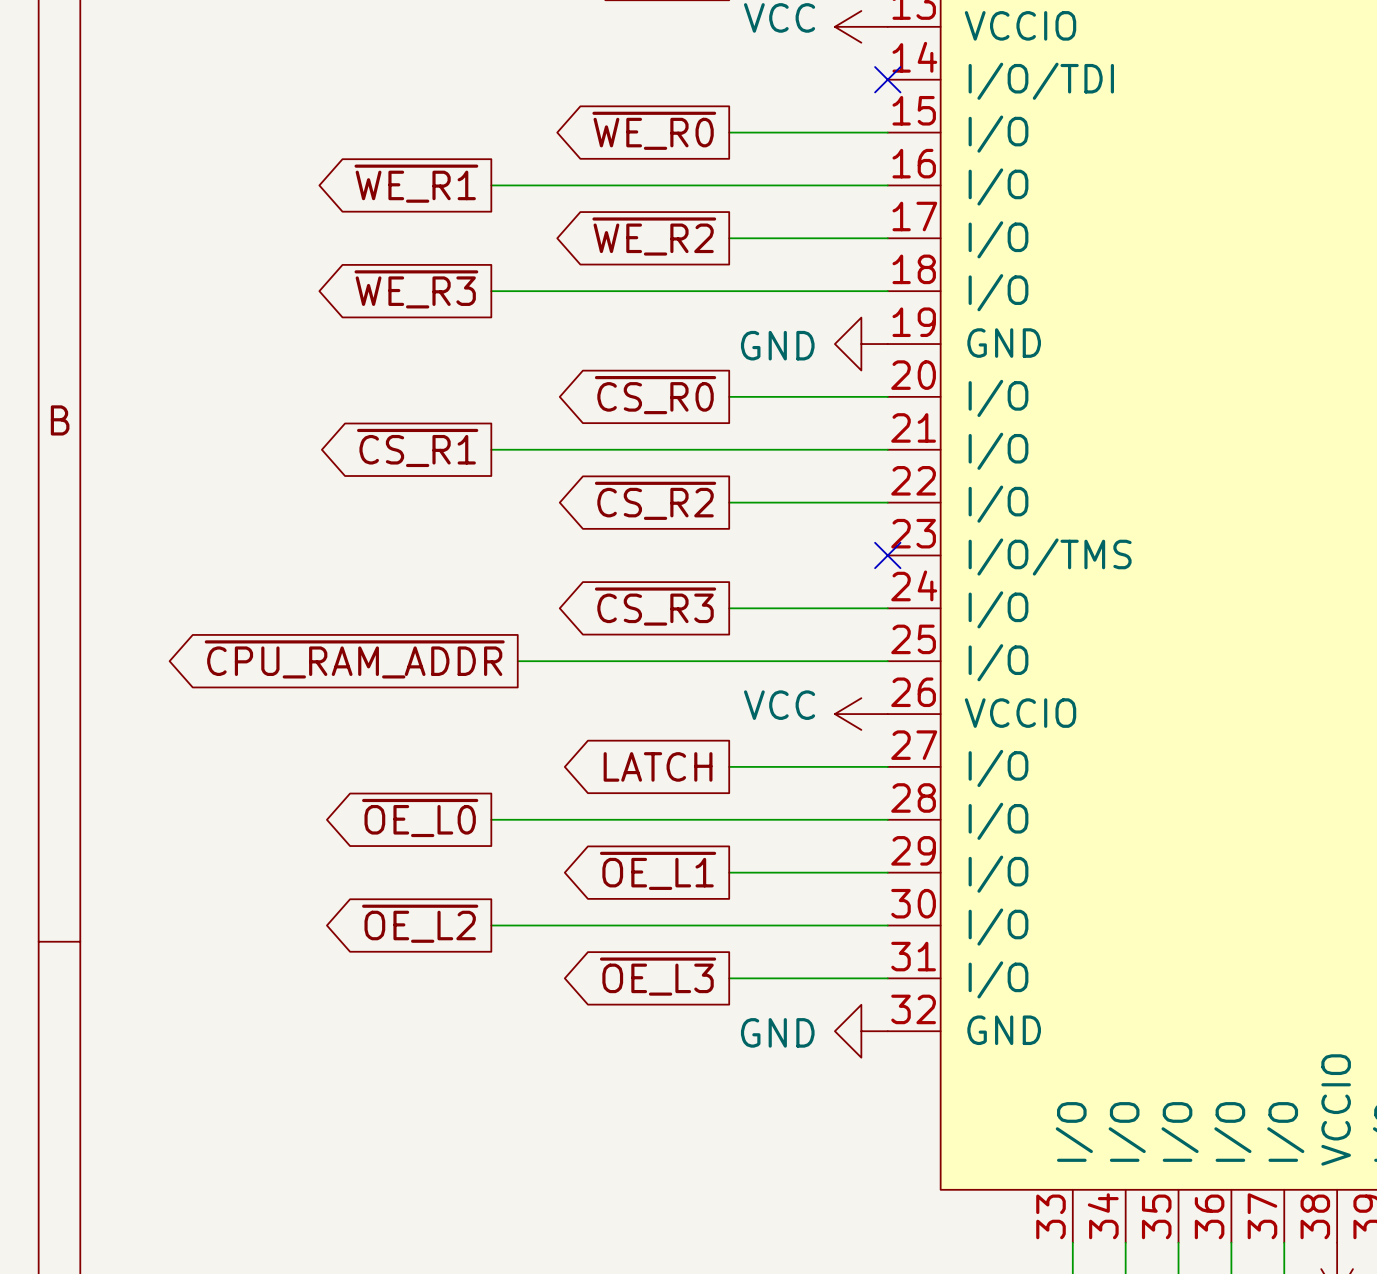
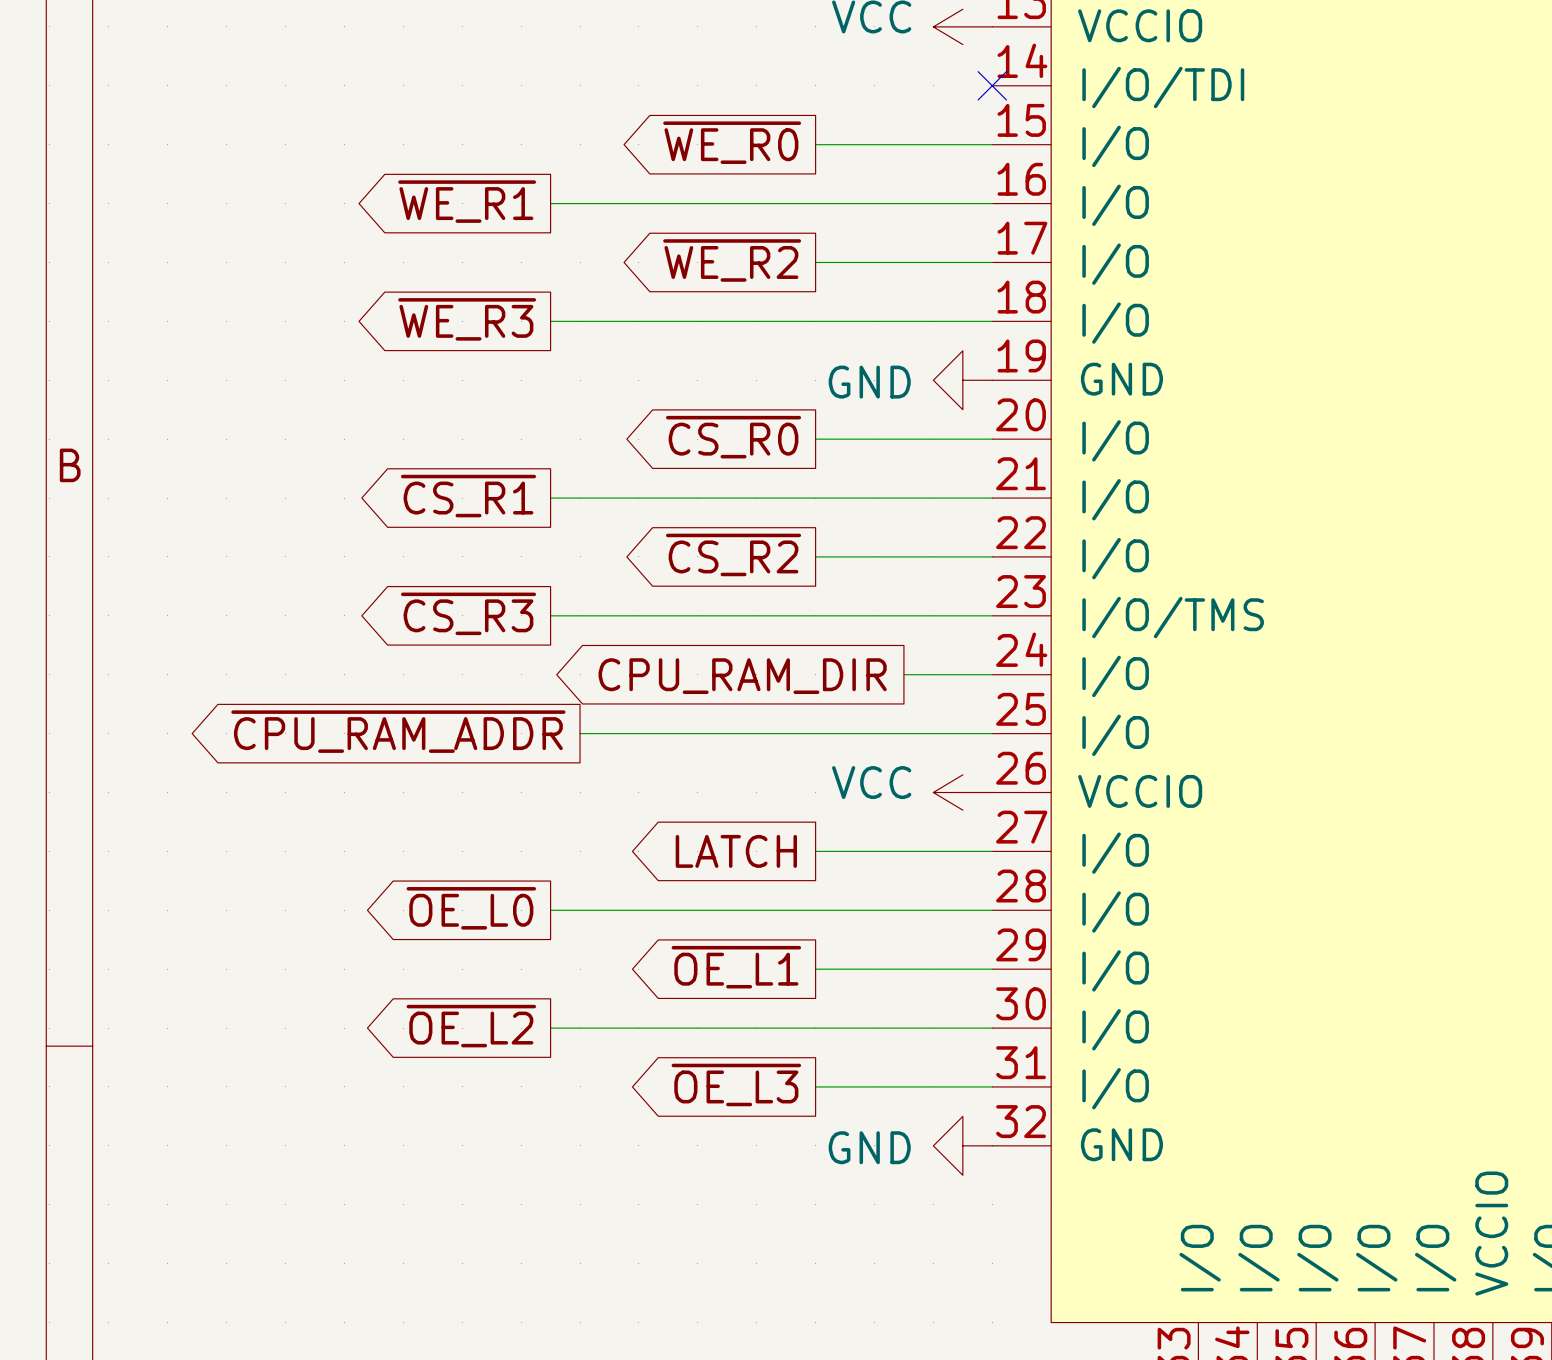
wire: none -> (550, 615) (992, 615)
no-connect mark: (887, 555) -> none
global label position: ~{CS_R3} (655, 606) -> ~{CS_R3} (468, 613)
wire: (729, 608) (808, 608) -> none
global label: none -> CPU_RAM_DIR (742, 676)

